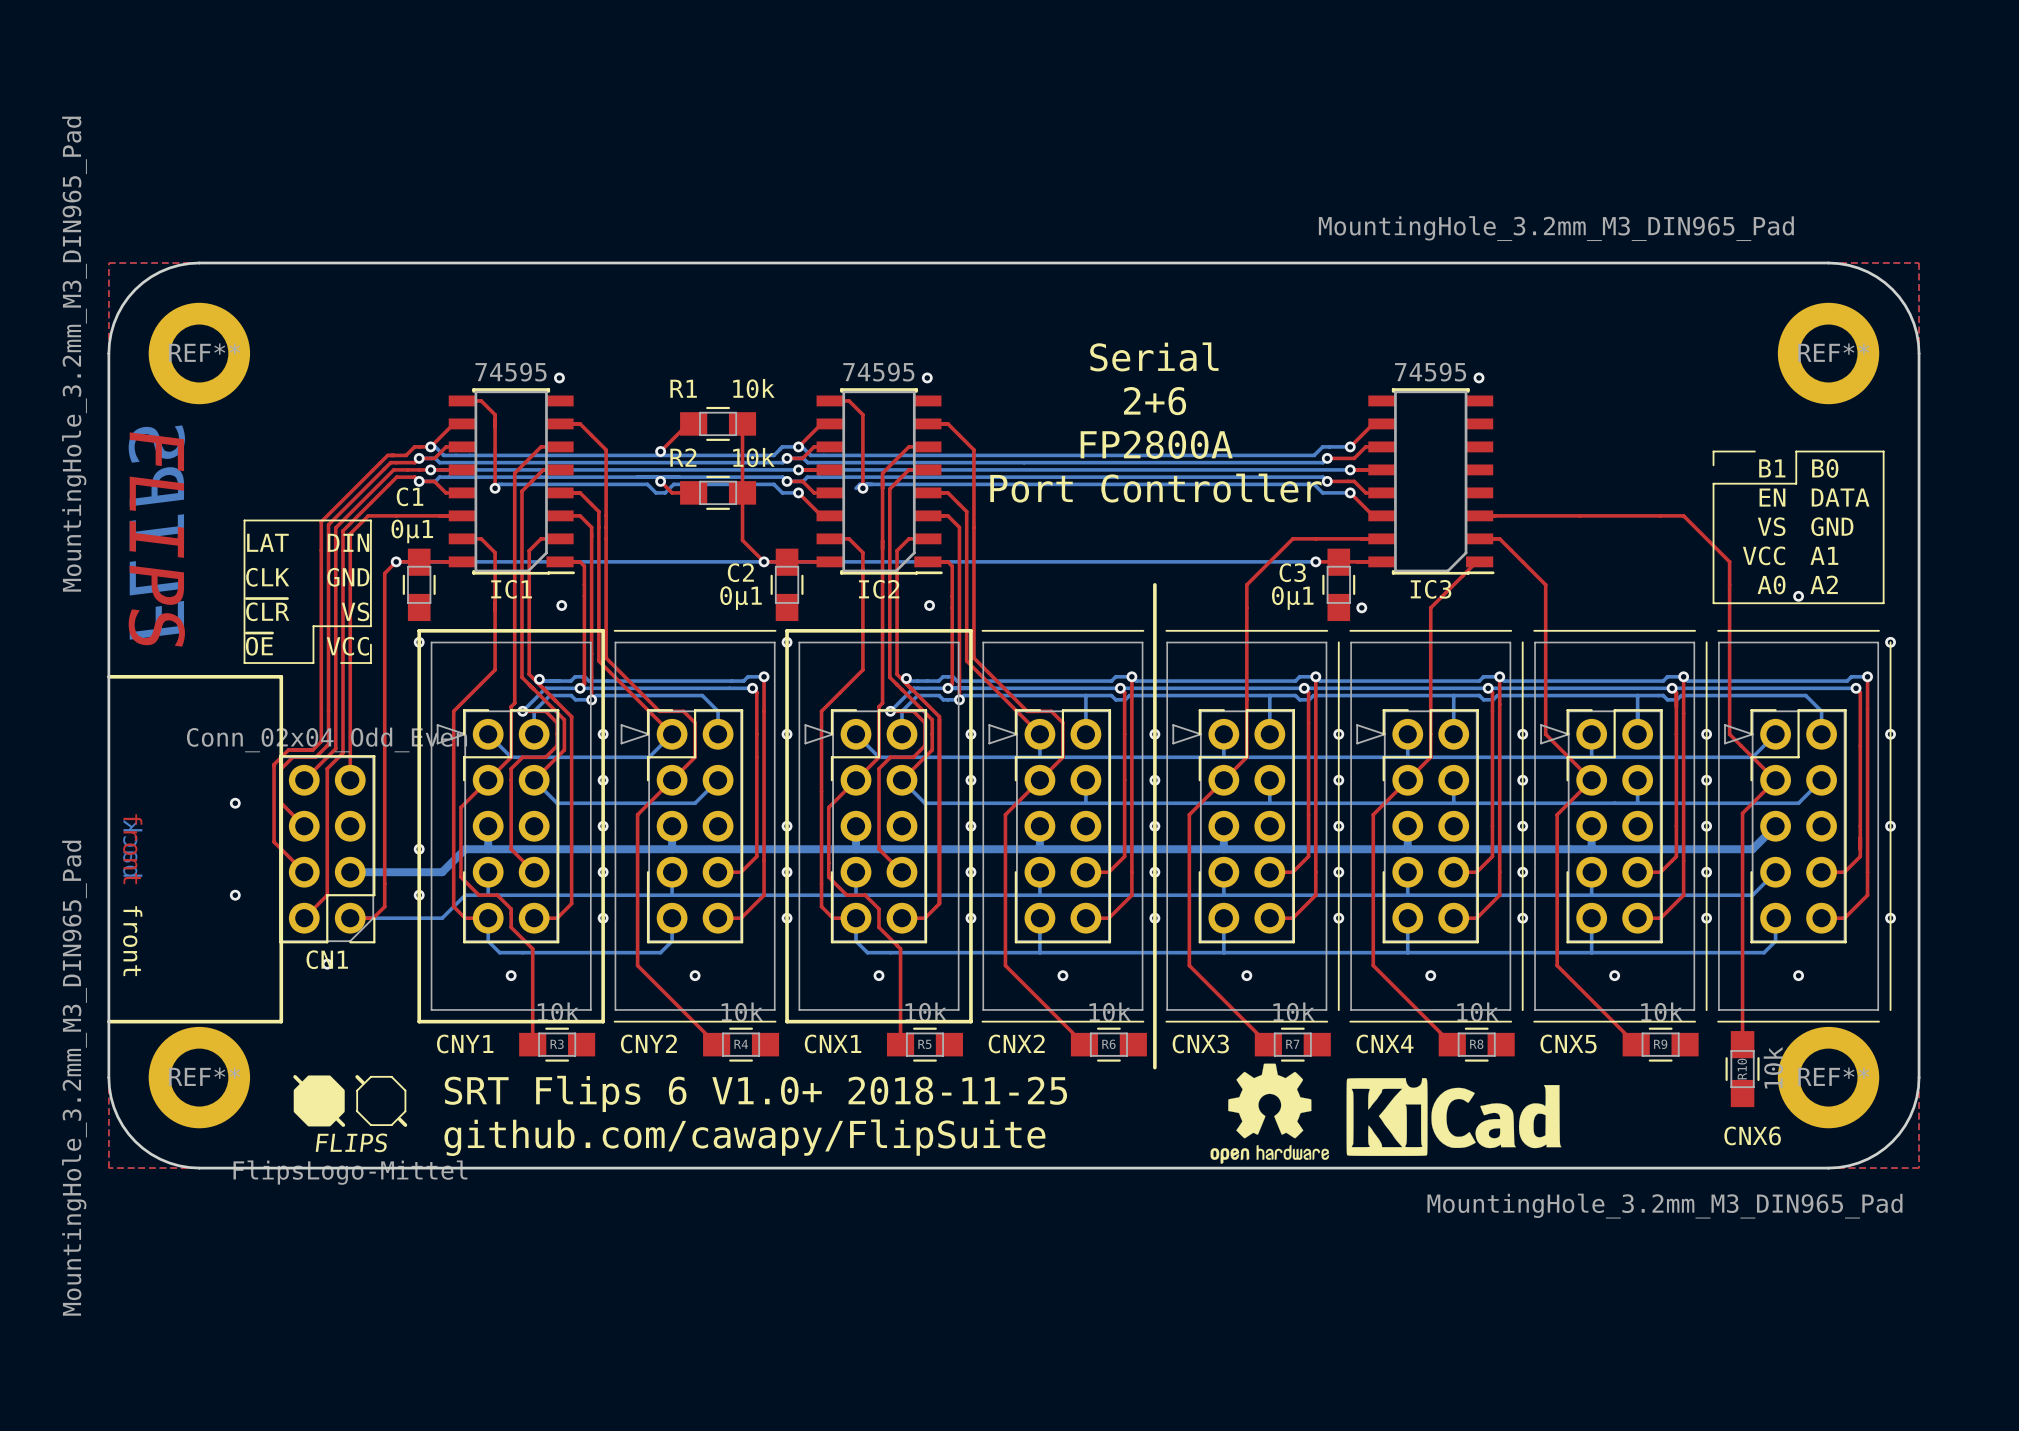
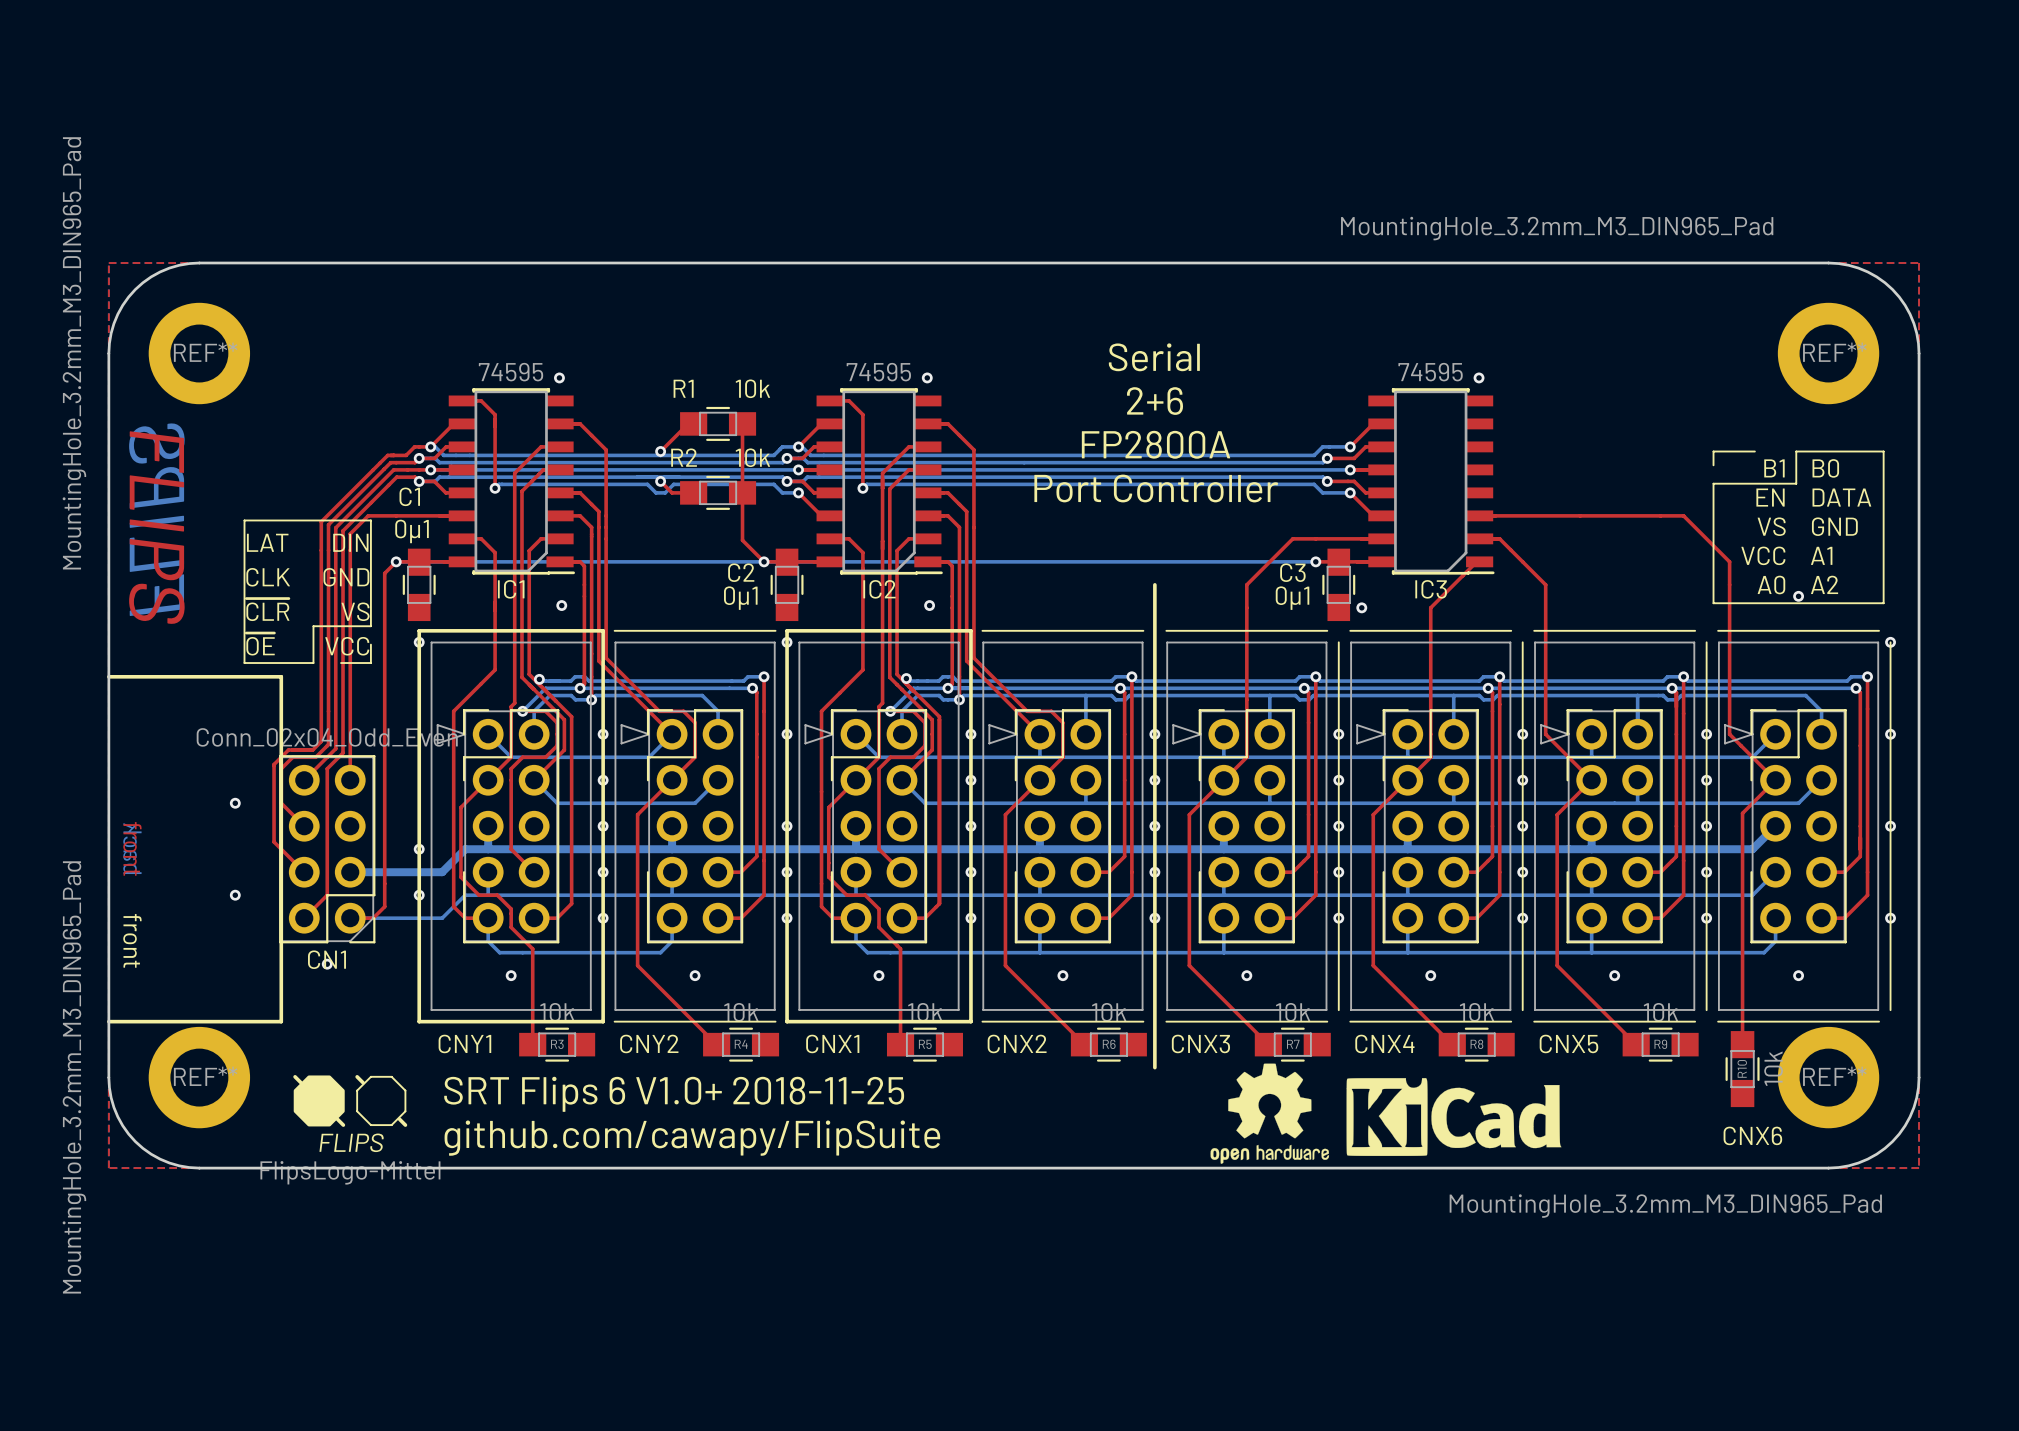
bottom track: (866, 484) (859, 484) (856, 488) -> none

